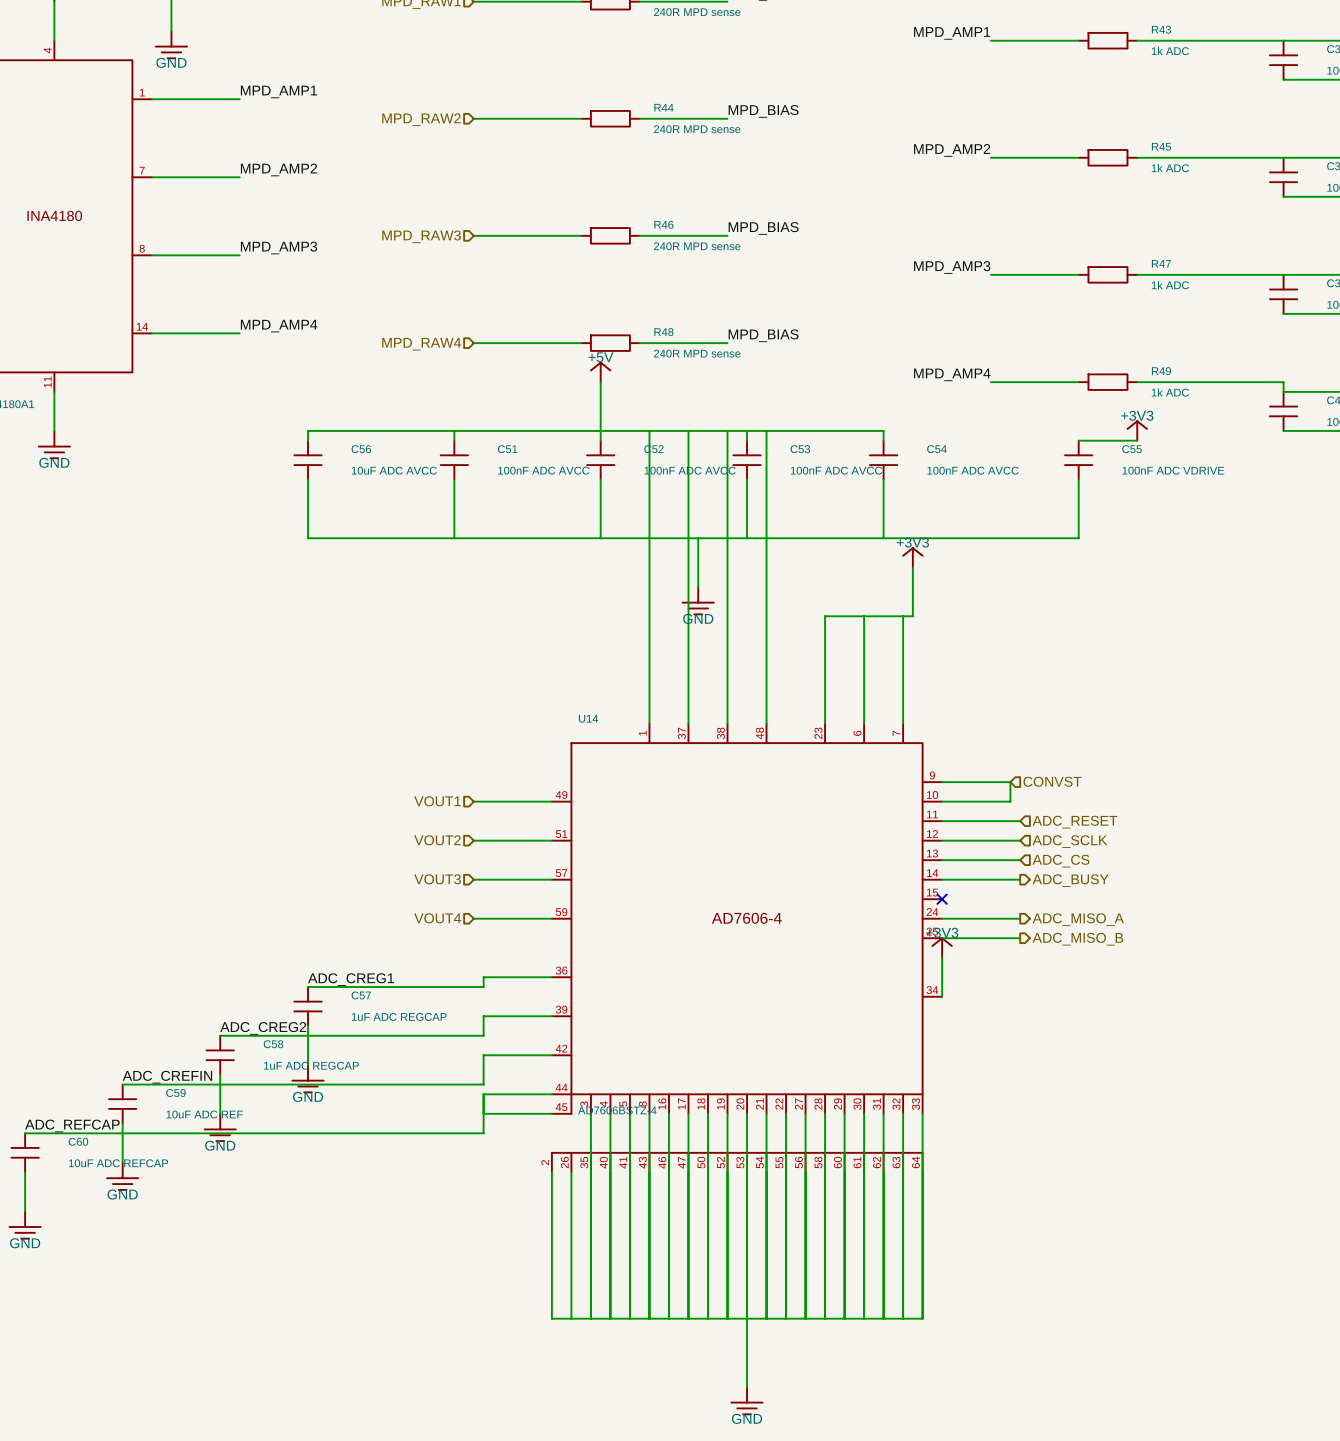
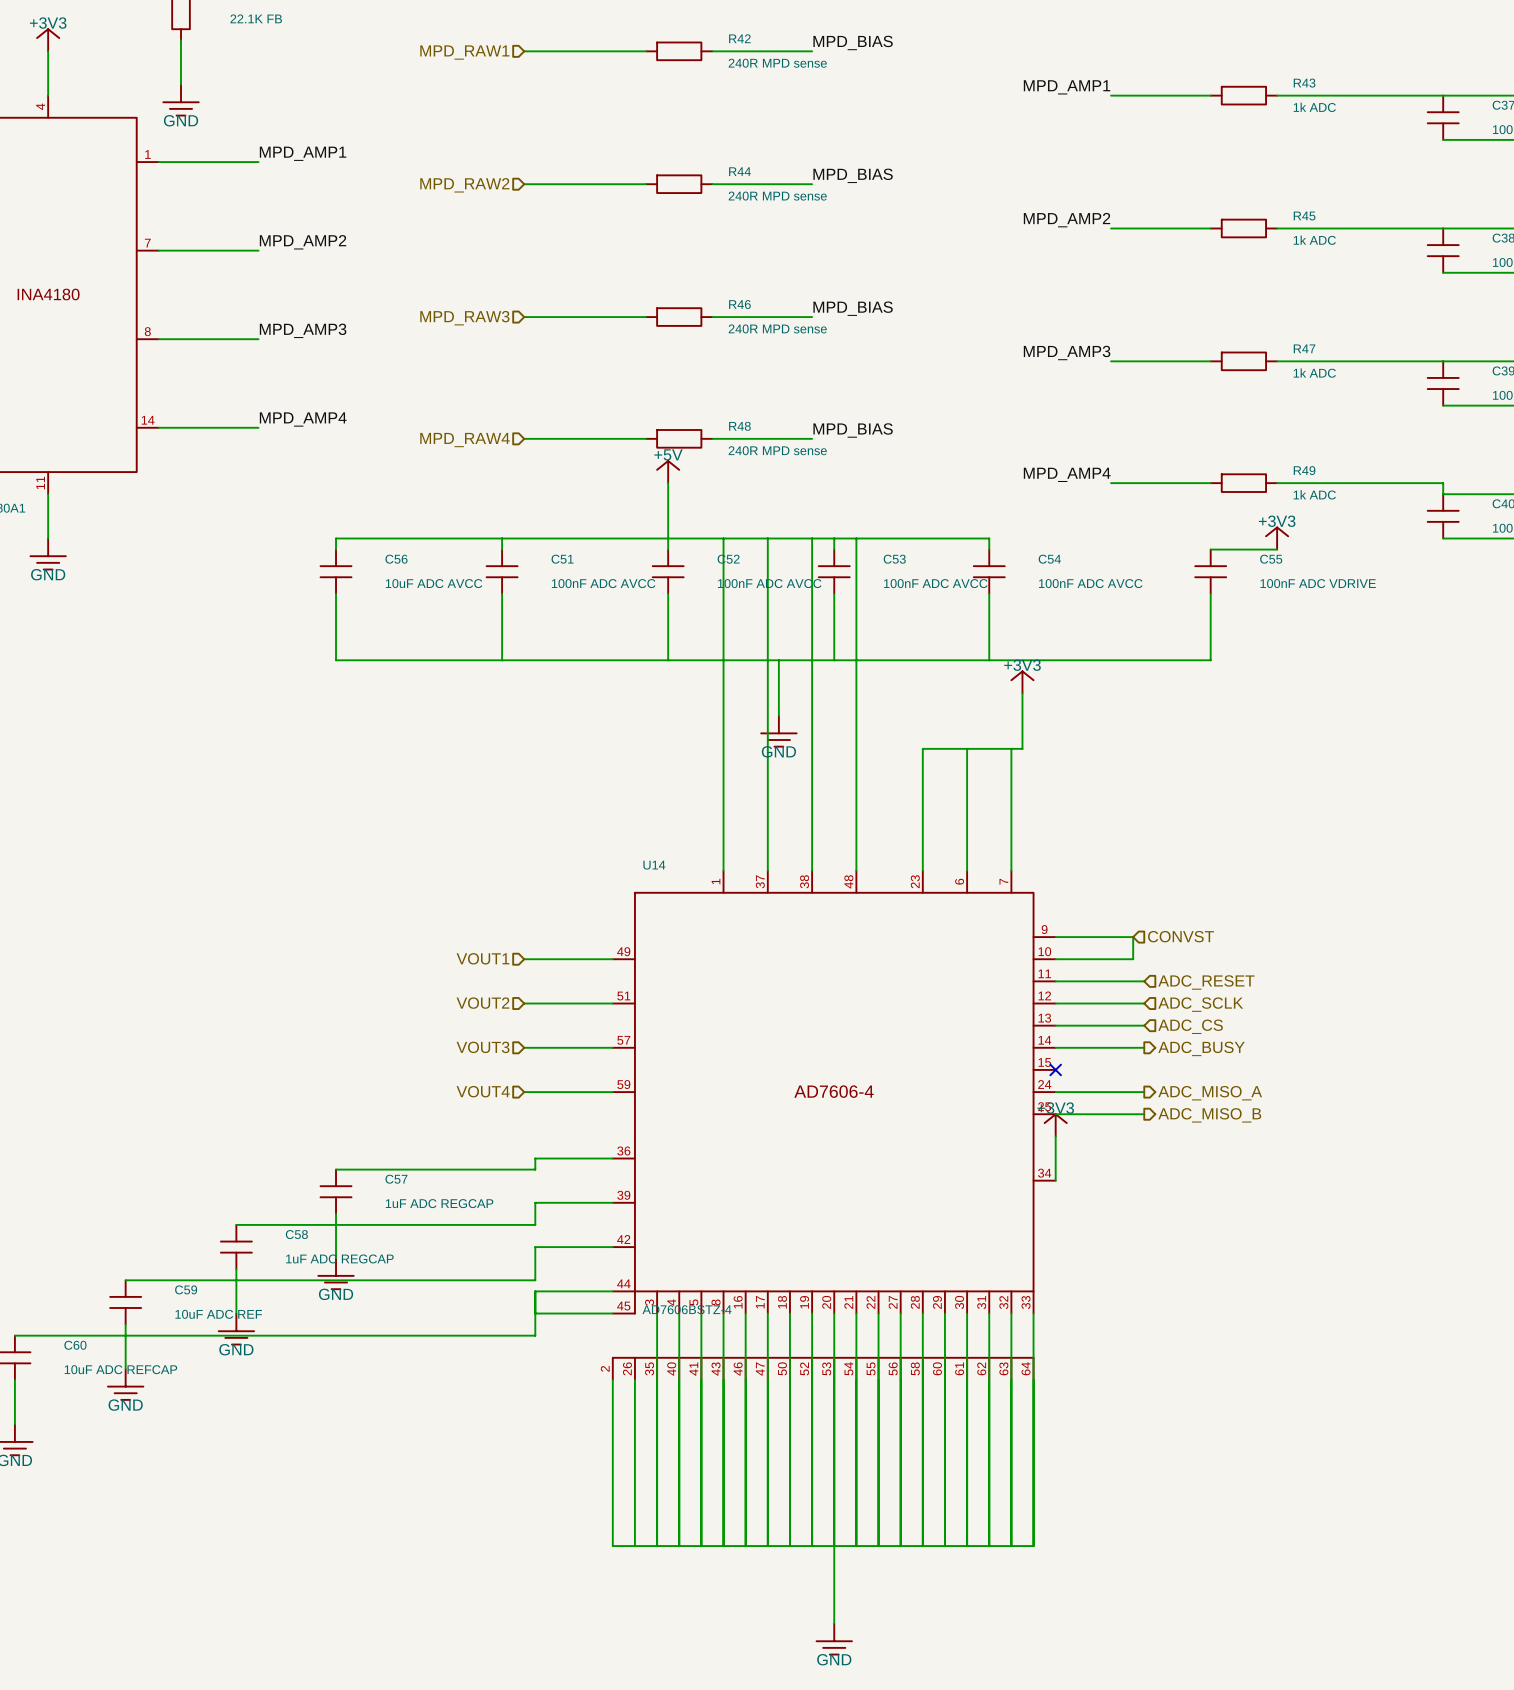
label: ADC_CREG1 (351, 979) -> none
label: ADC_CREG2 (263, 1028) -> none
label: ADC_CREFIN (167, 1077) -> none
label: ADC_REFCAP (72, 1125) -> none

